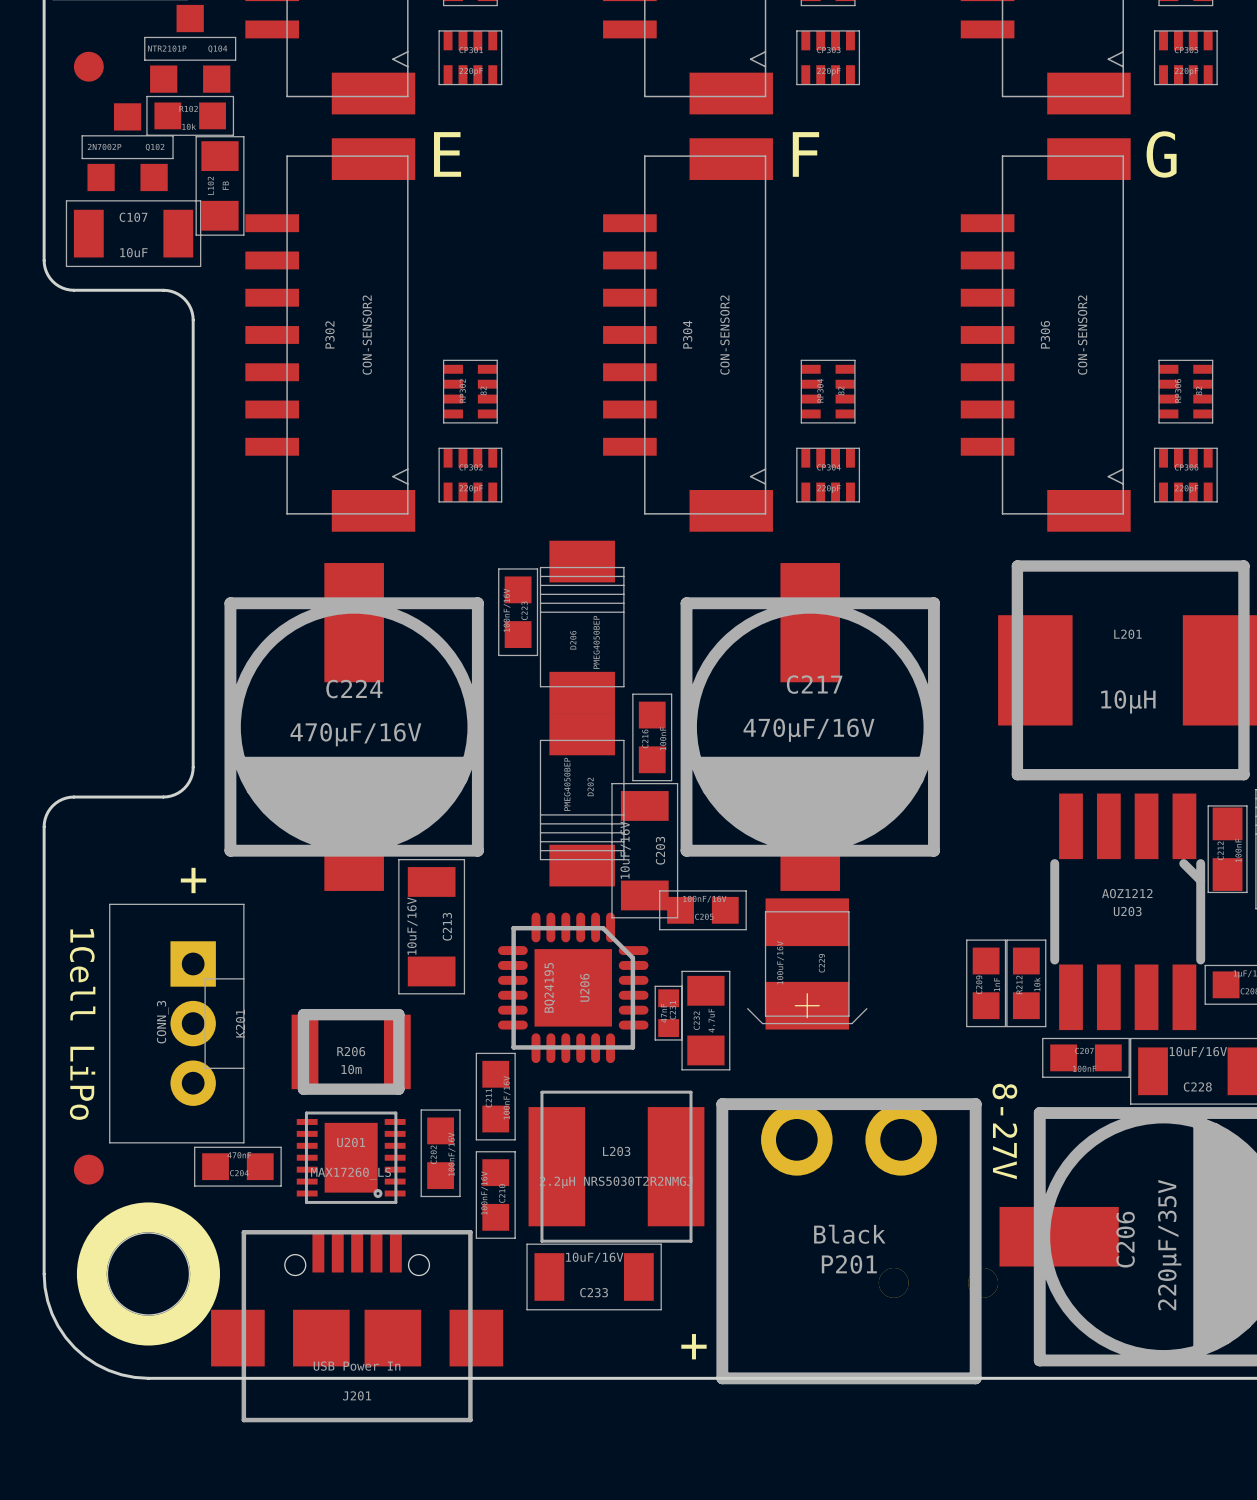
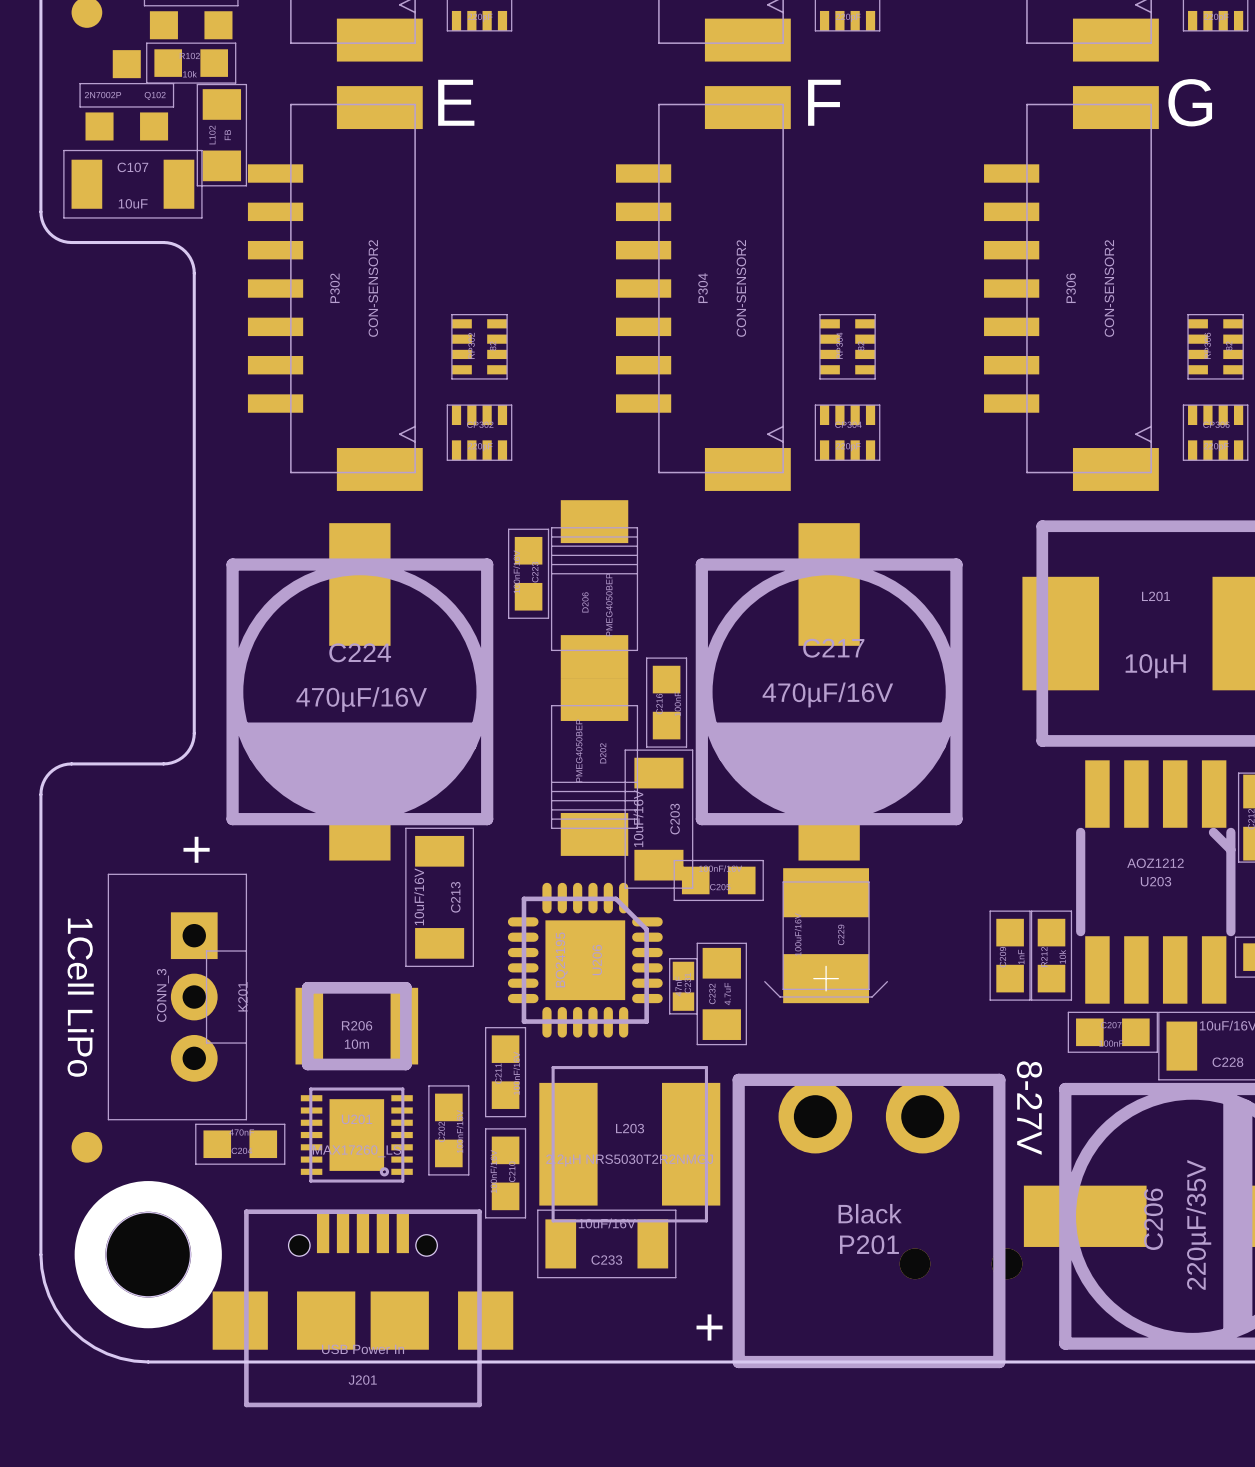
C233 position: (594, 1276) -> (606, 1243)

